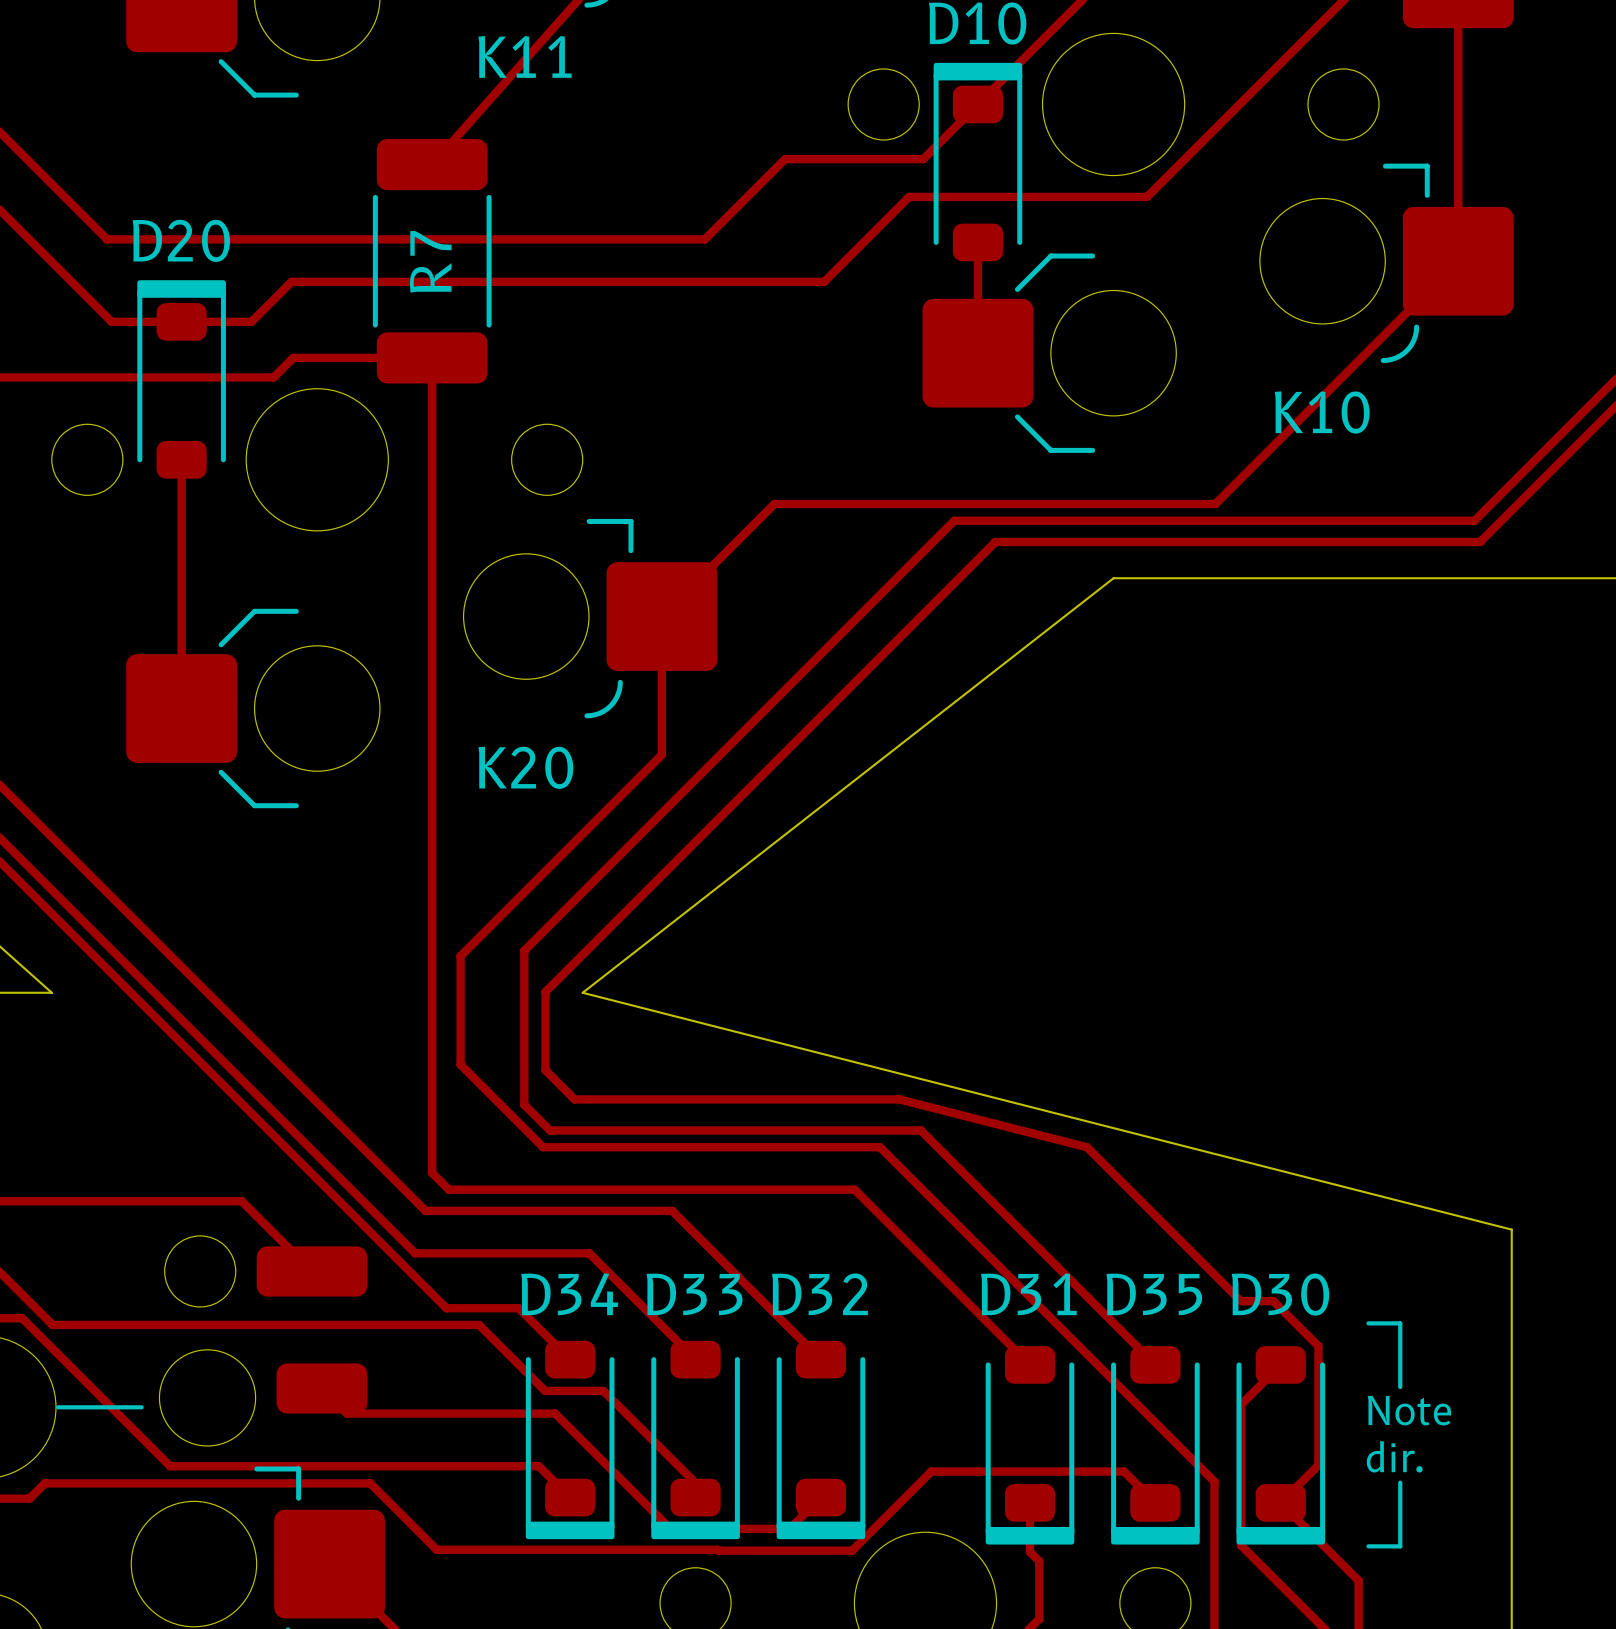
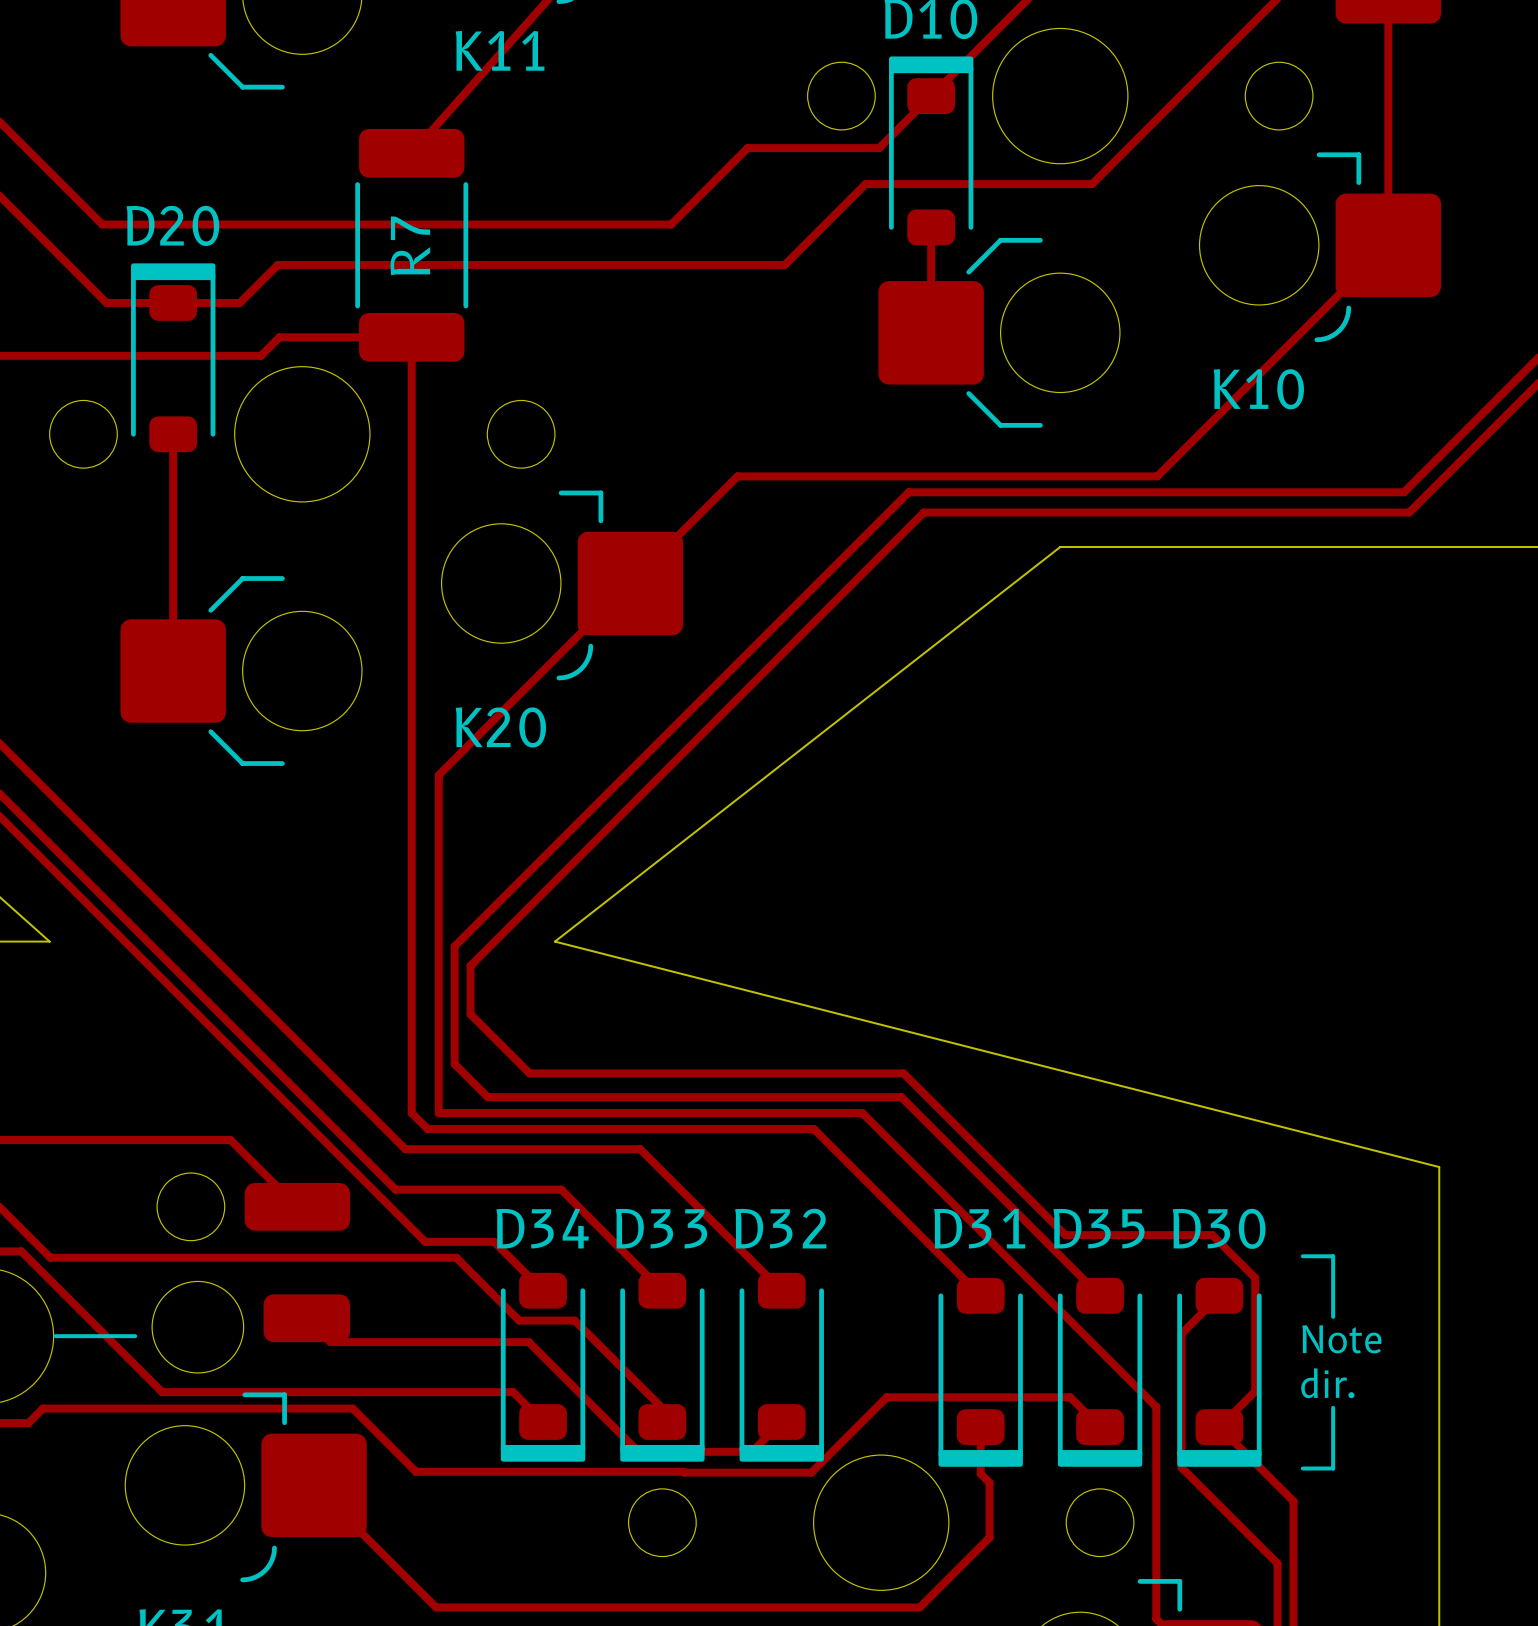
track: (995, 541) (545, 991) (545, 1070) (574, 1099) (899, 1099) (1087, 1147) (1241, 1301) -> (947, 512) (923, 512) (470, 965) (470, 1014) (529, 1073) (903, 1073) (1065, 1235) (1181, 1235)
track: (661, 616) (661, 754) (460, 956) -> (630, 583) (438, 775) (438, 906)
track: (524, 950) (524, 1104) (550, 1130) (920, 1130) (946, 1156) -> (499, 901) (454, 946) (454, 1064) (487, 1097) (901, 1097)
track: (460, 1064) (543, 1147) (880, 1147) (905, 1172) -> (438, 1010) (438, 1113) (862, 1113)

